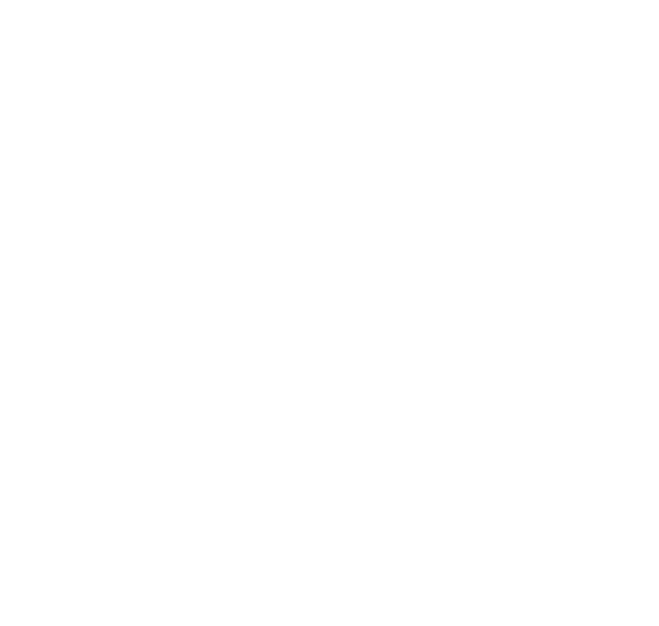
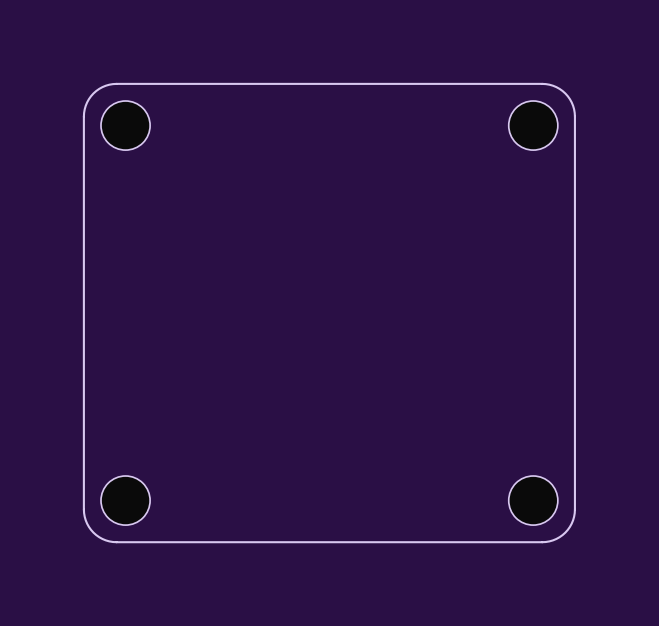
part: none -> (329, 313)

